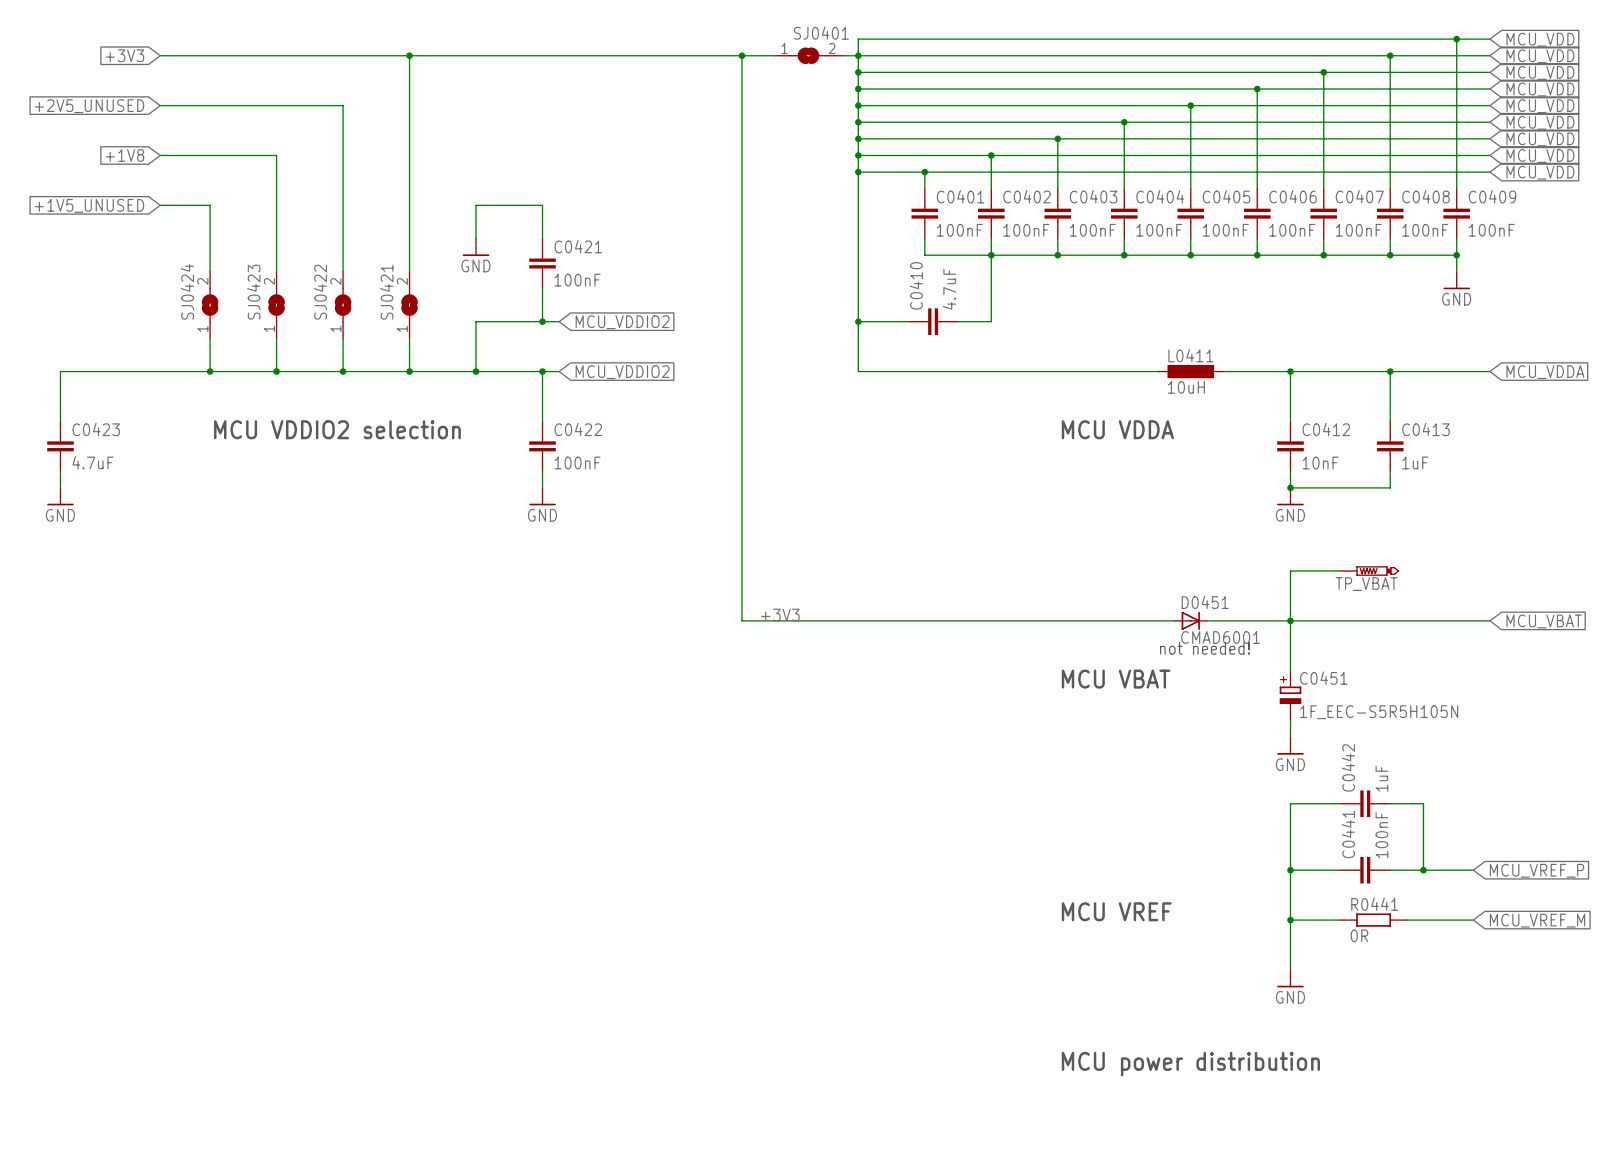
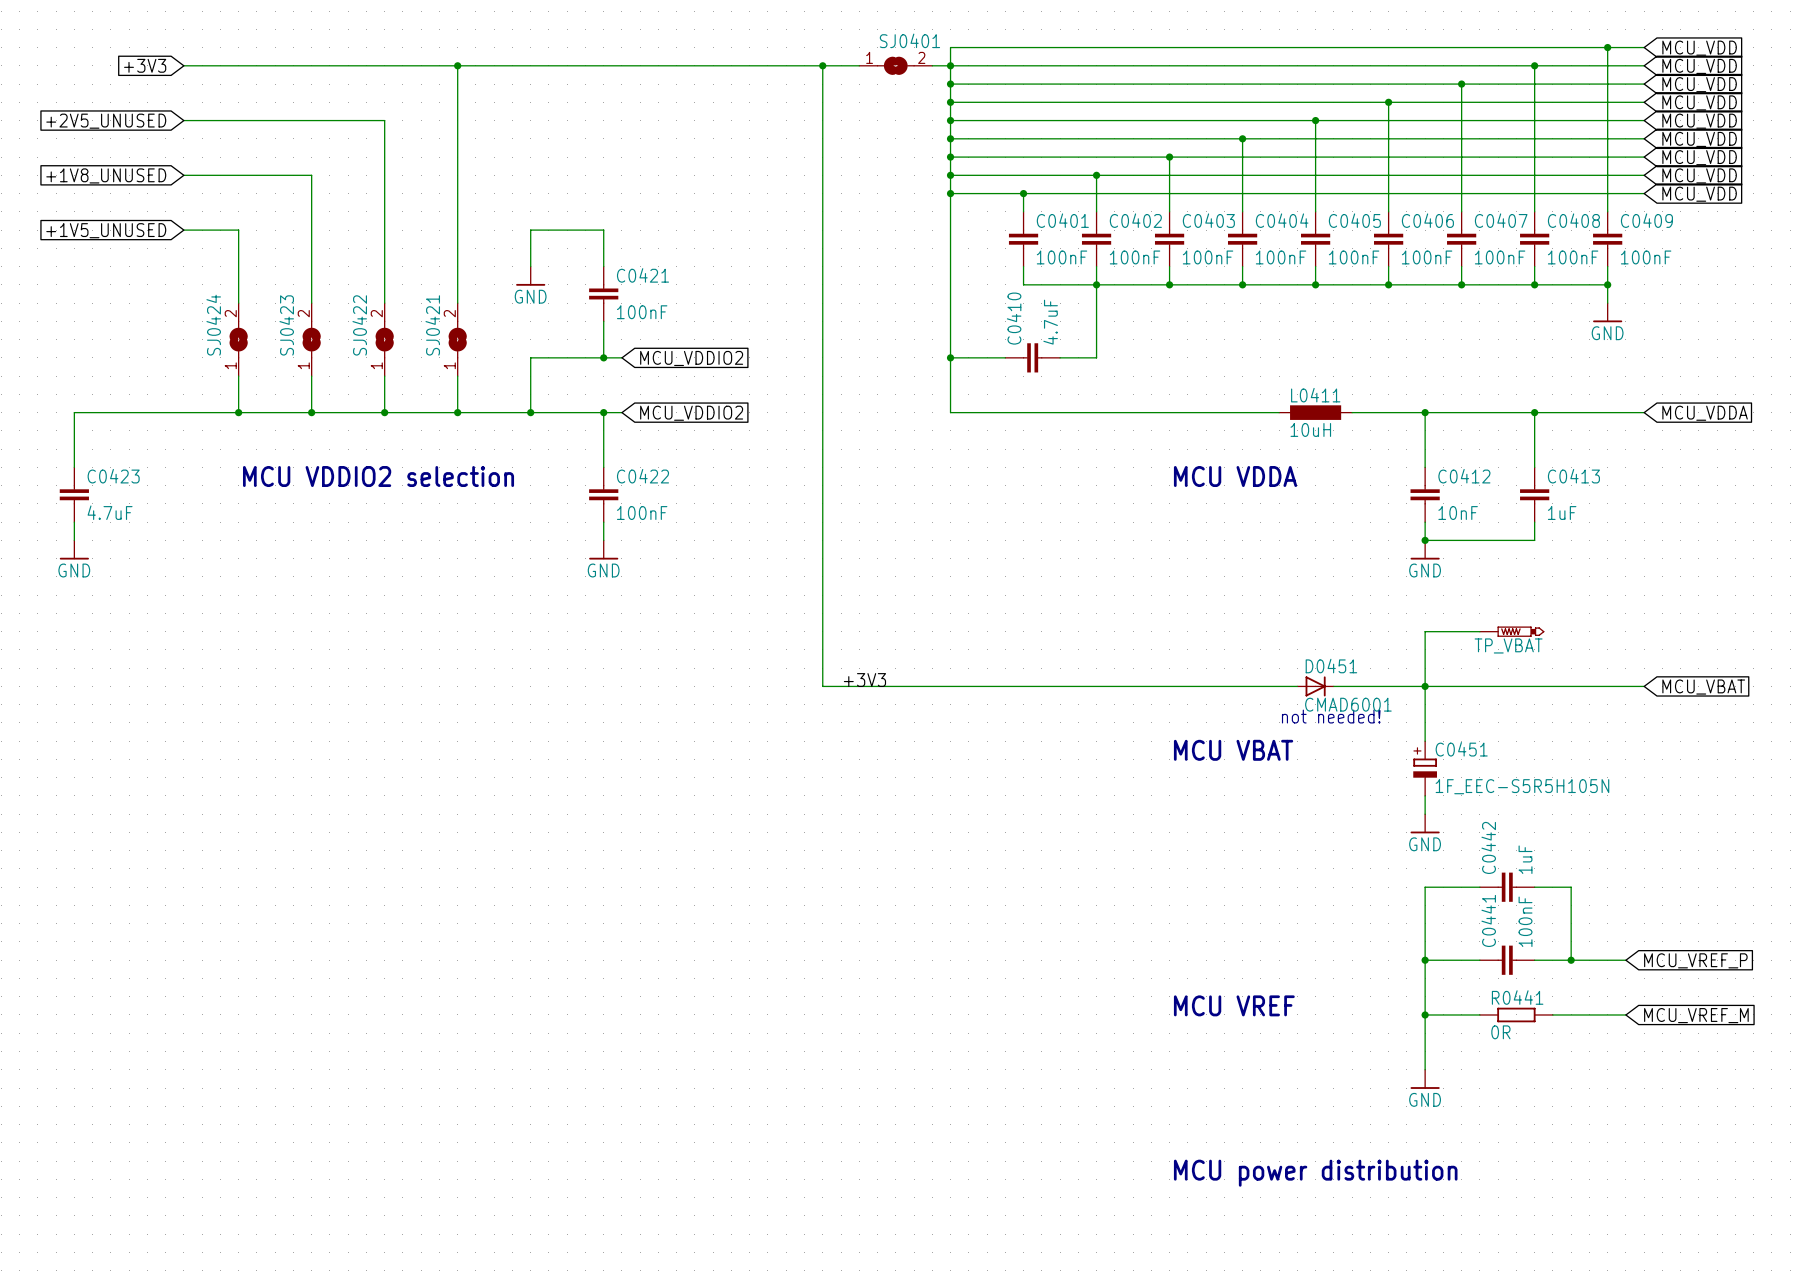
global label: +1V8 (124, 155) -> +1V8_UNUSED (106, 175)

